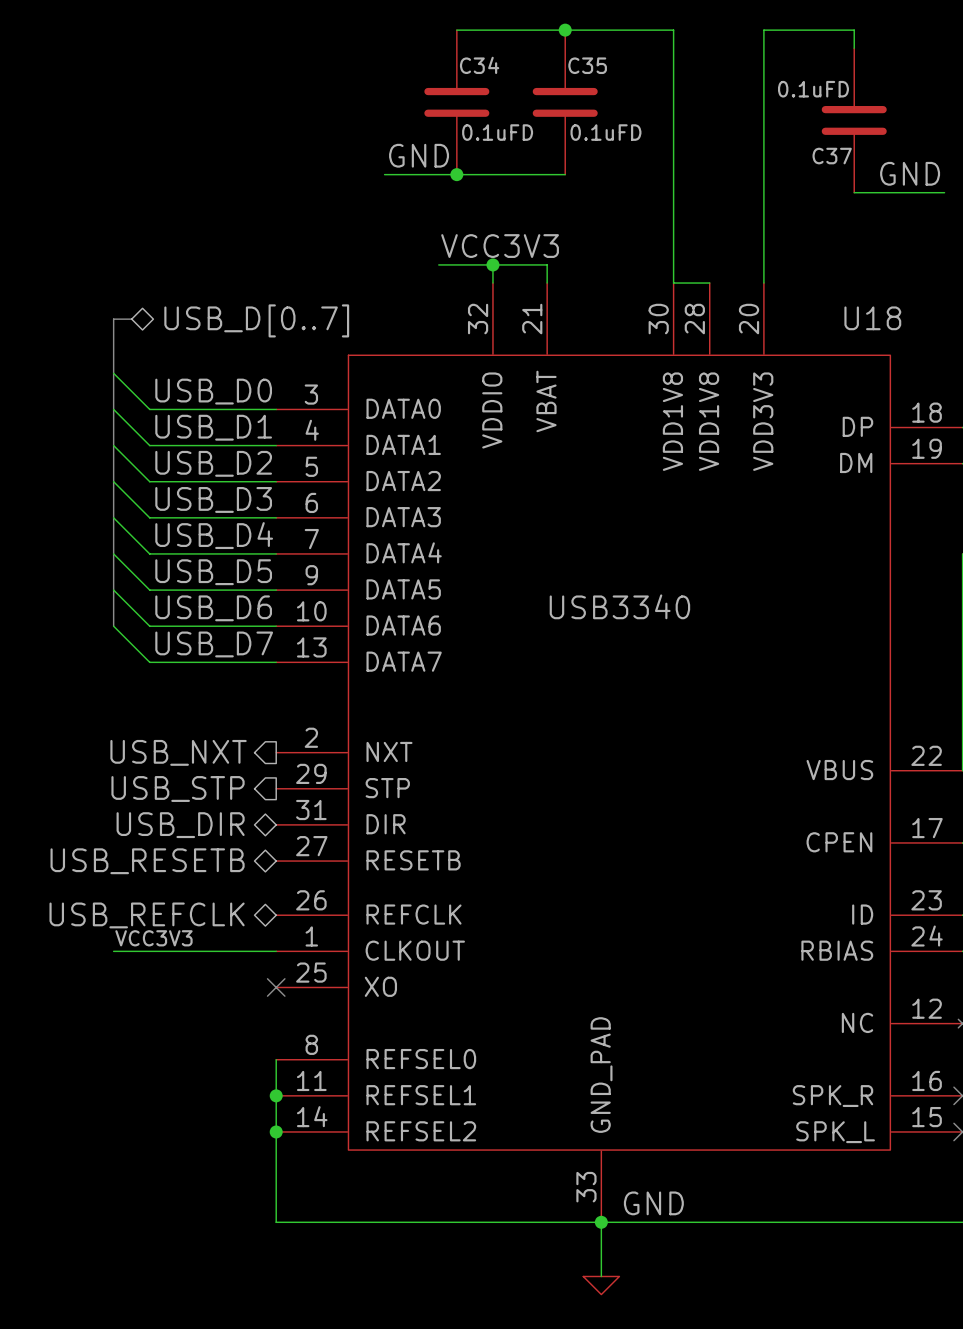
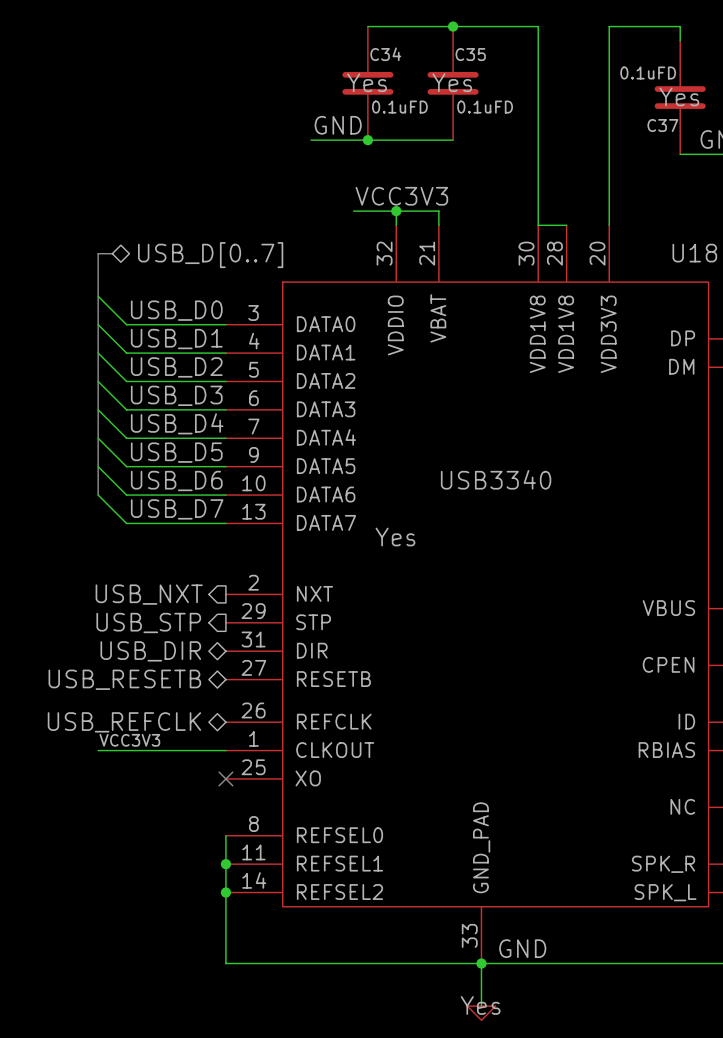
C34 text: none -> Yes (367, 82)
C35 text: none -> Yes (452, 82)
C37 text: none -> Yes (679, 96)
U18 text: none -> Yes (395, 537)
power symbol text: none -> Yes (480, 1005)

